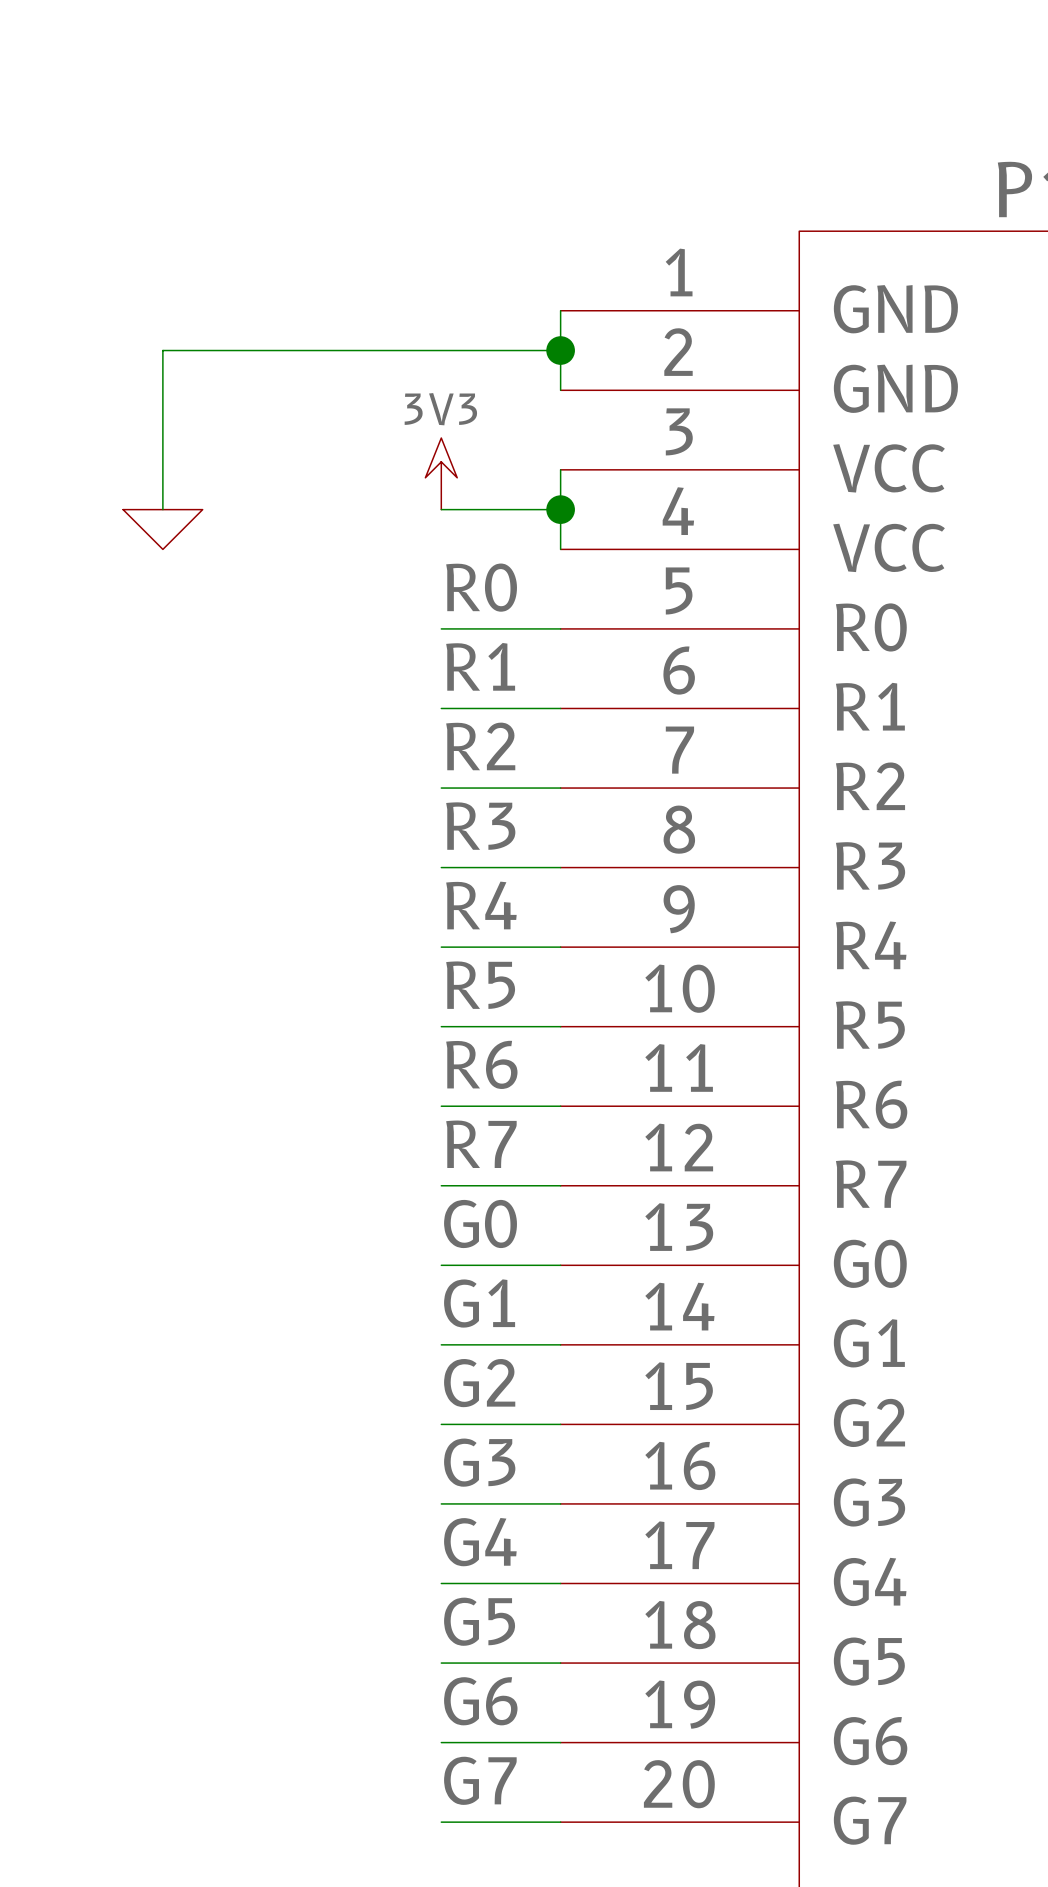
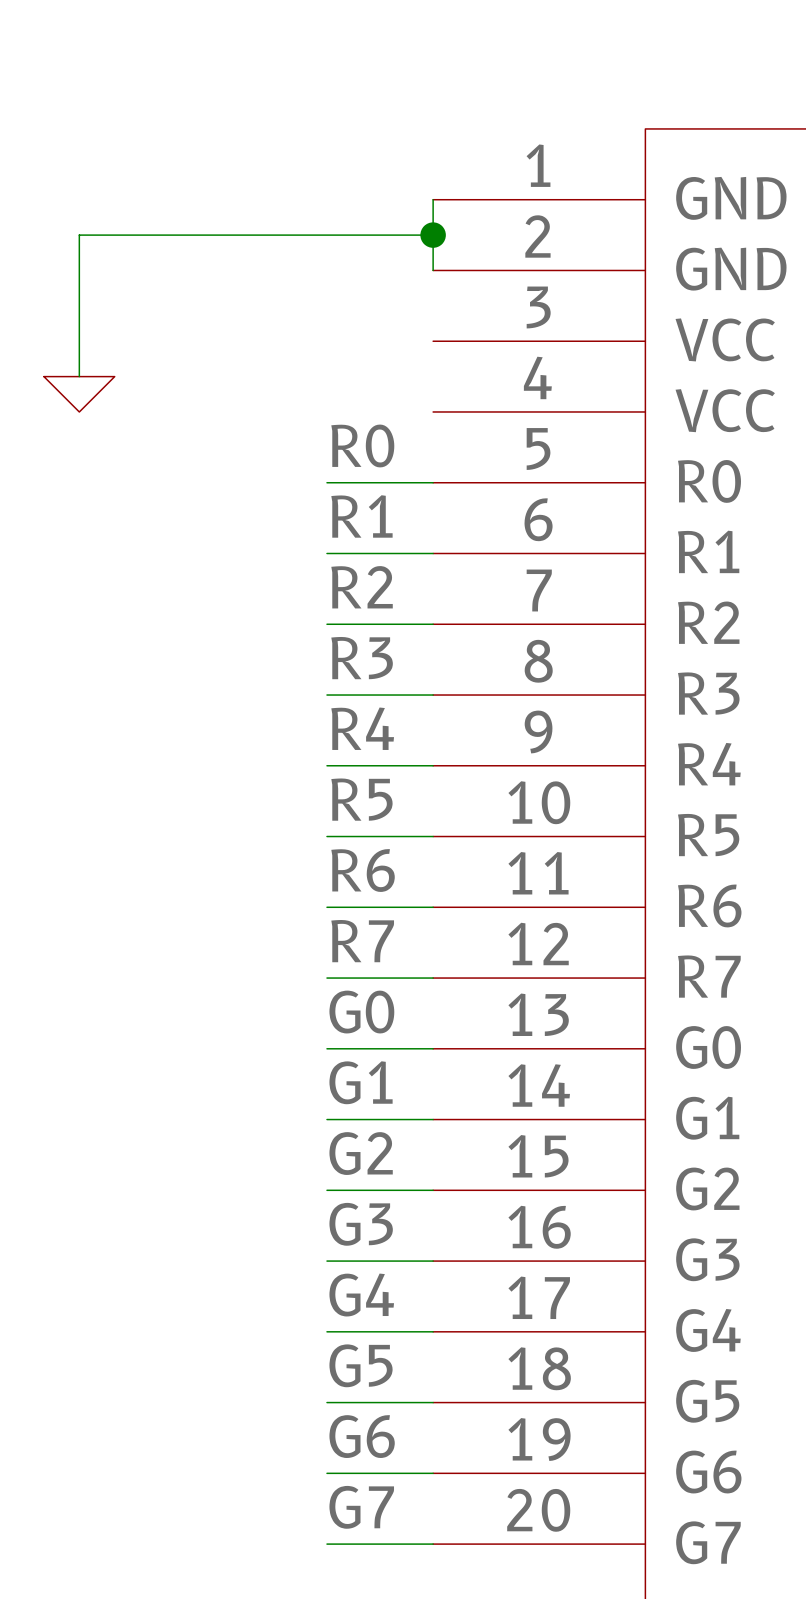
wire: (560, 469) (560, 549) -> none
power symbol: 3V3 (441, 473) -> none
wire: (441, 509) (560, 509) -> none
junction: (560, 509) -> none

